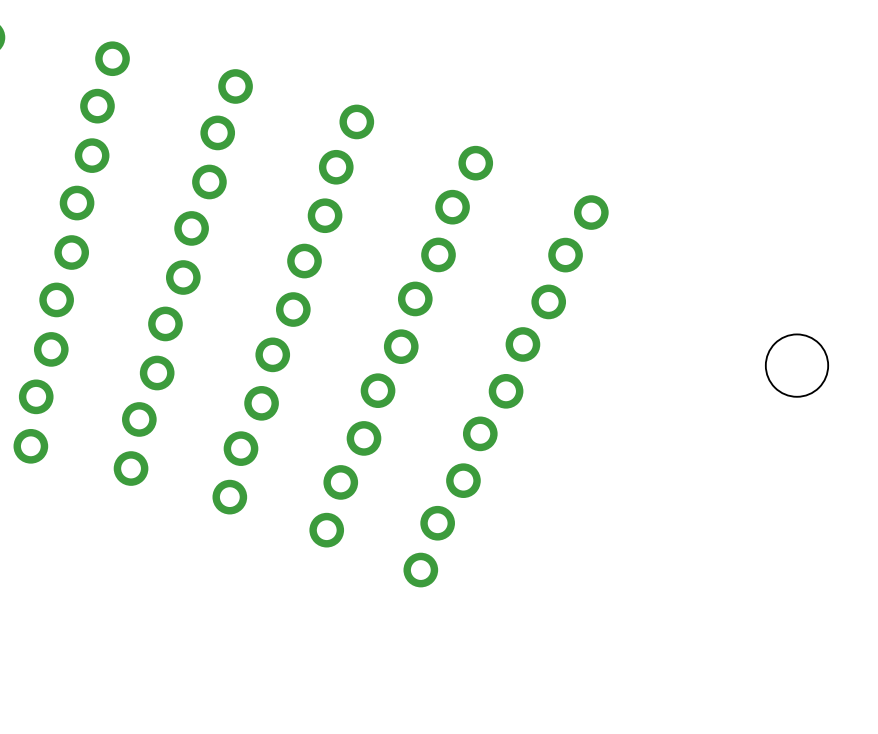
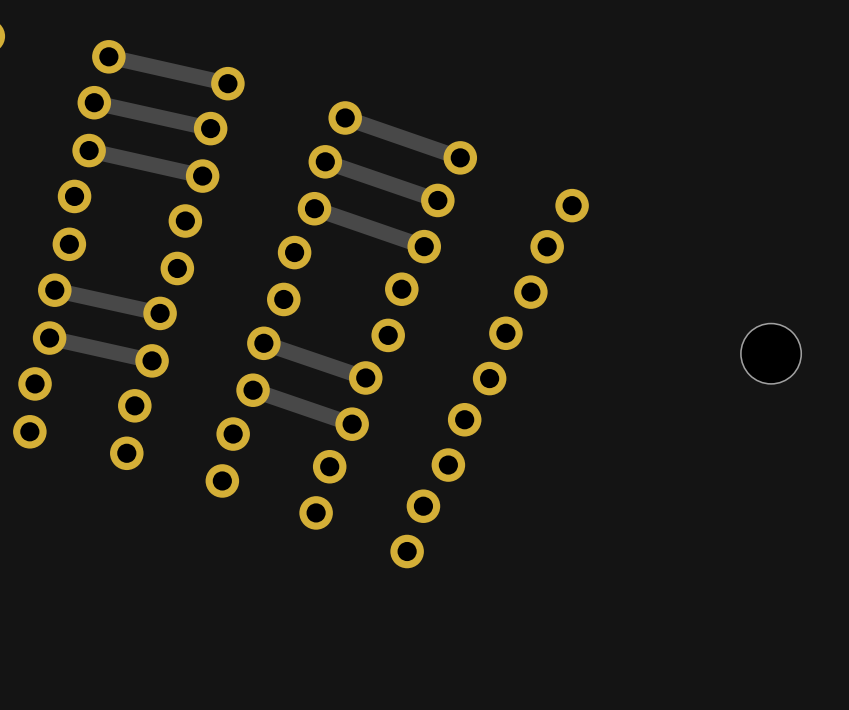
track: none -> (108, 56) (227, 83)
track: none -> (94, 102) (210, 128)
track: none -> (345, 117) (460, 157)
track: none -> (89, 150) (202, 176)
track: none -> (325, 161) (437, 200)
track: none -> (314, 208) (424, 246)
track: none -> (54, 290) (160, 313)
track: none -> (49, 338) (152, 360)
track: none -> (263, 343) (365, 377)
track: none -> (253, 390) (352, 424)

